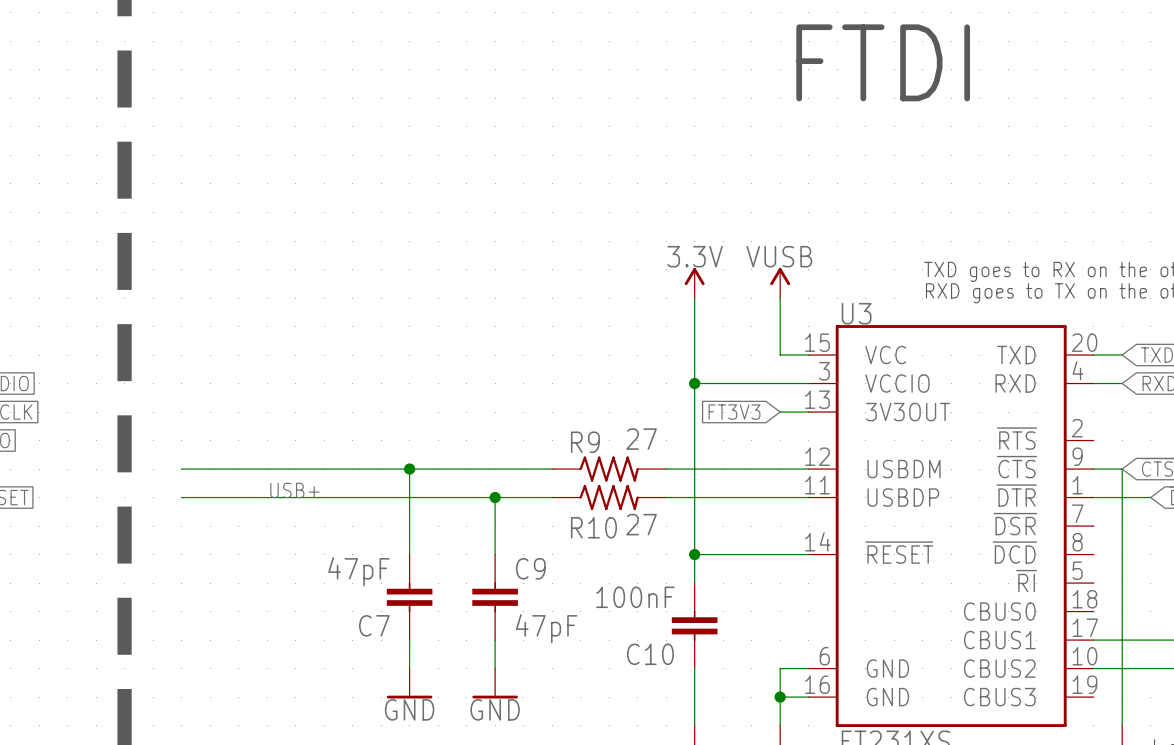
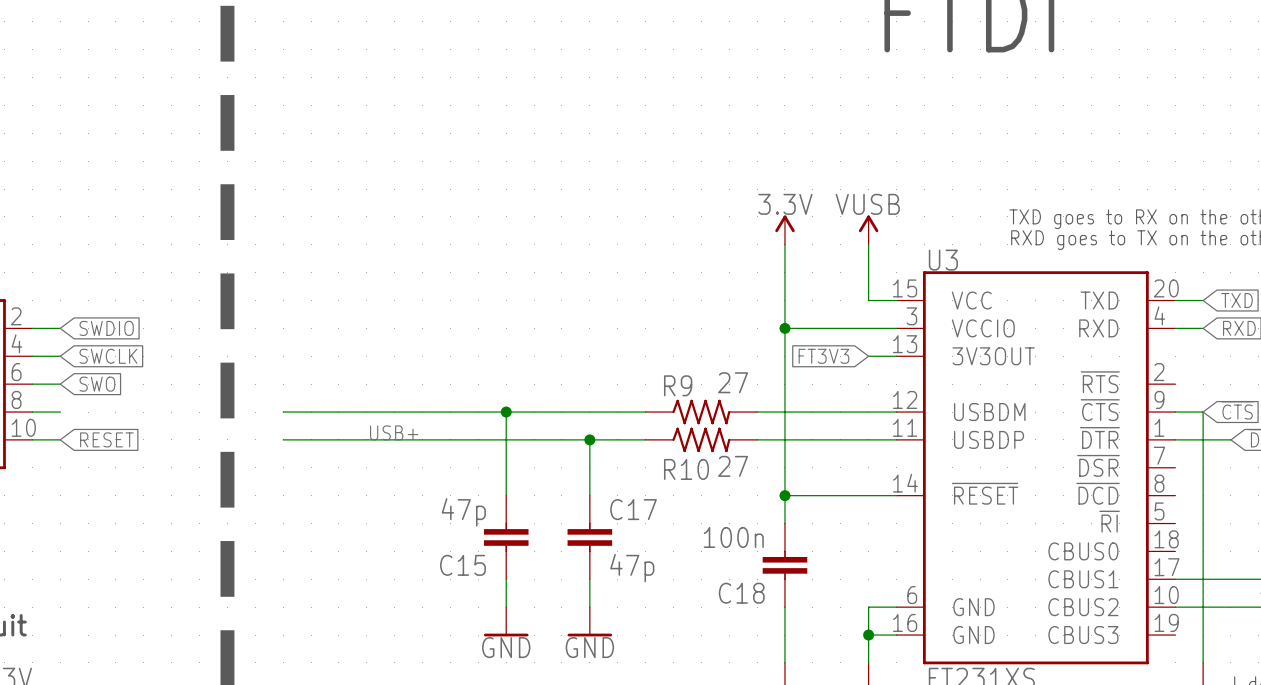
C9 name: C9 (530, 568) -> C17 (633, 509)
C7 value: 47pF (358, 571) -> 47p (463, 512)
C10 value: 100nF (635, 597) -> 100n (733, 537)
C7 name: C7 (374, 625) -> C15 (462, 565)
C9 value: 47pF (546, 628) -> 47p (632, 568)
C10 name: C10 (650, 654) -> C18 (741, 593)

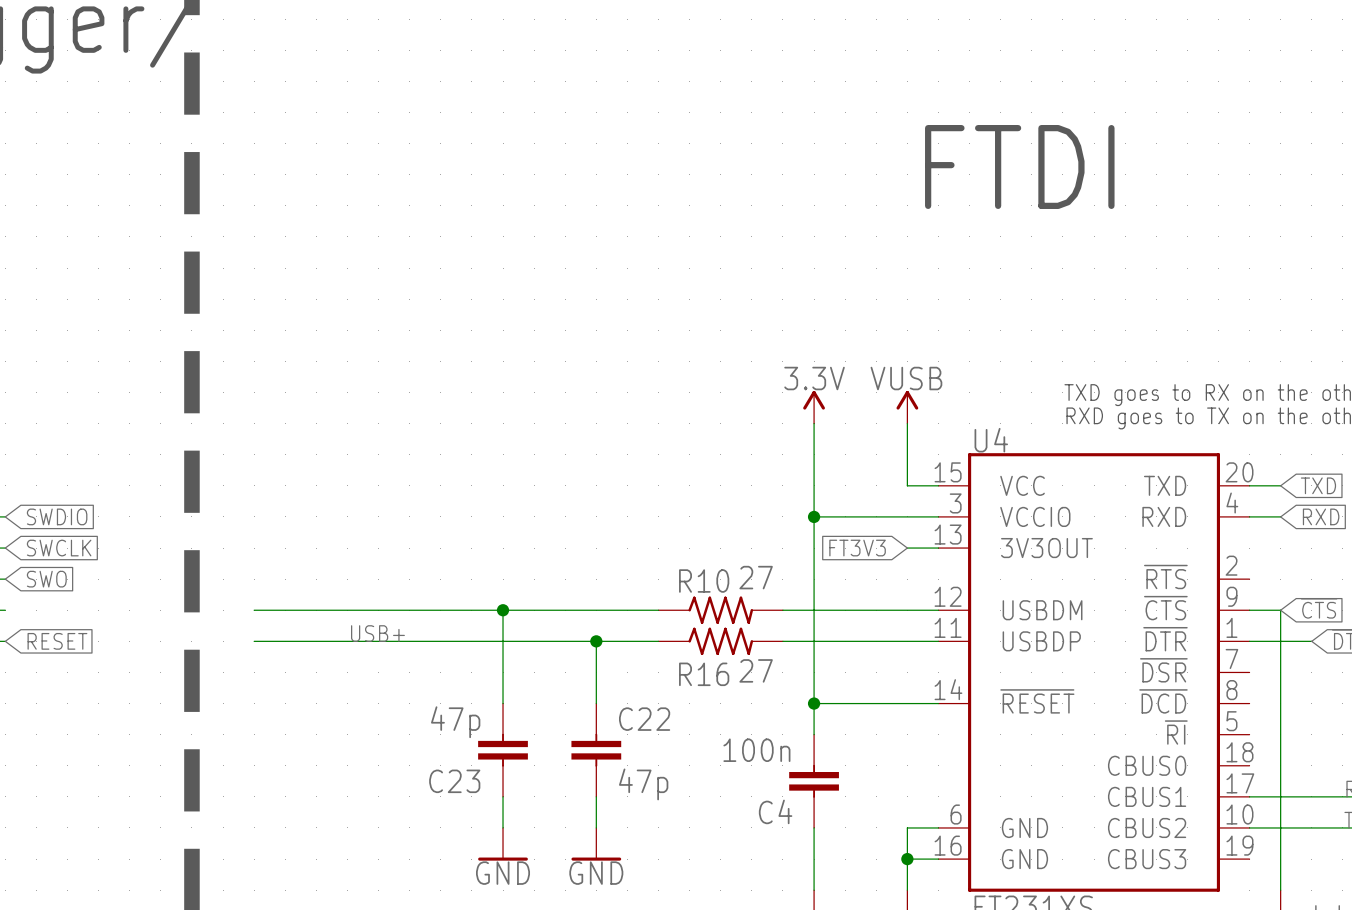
U3 name: U3 (943, 260) -> U4 (991, 440)
R9 name: R9 (678, 385) -> R10 (704, 581)
R10 name: R10 (686, 469) -> R16 (704, 674)
C17 name: C17 (633, 509) -> C22 (644, 719)
C15 name: C15 (462, 565) -> C23 (454, 781)
C18 name: C18 (741, 593) -> C4 (775, 811)

